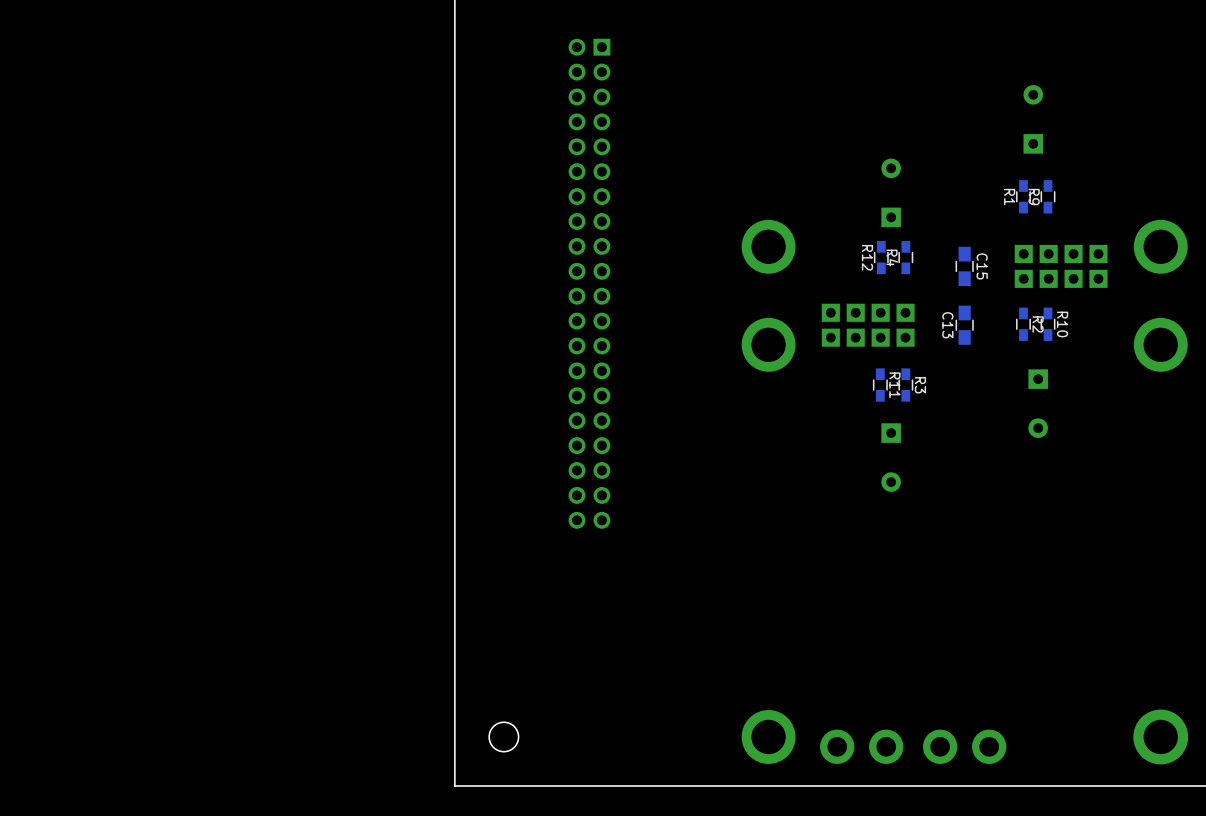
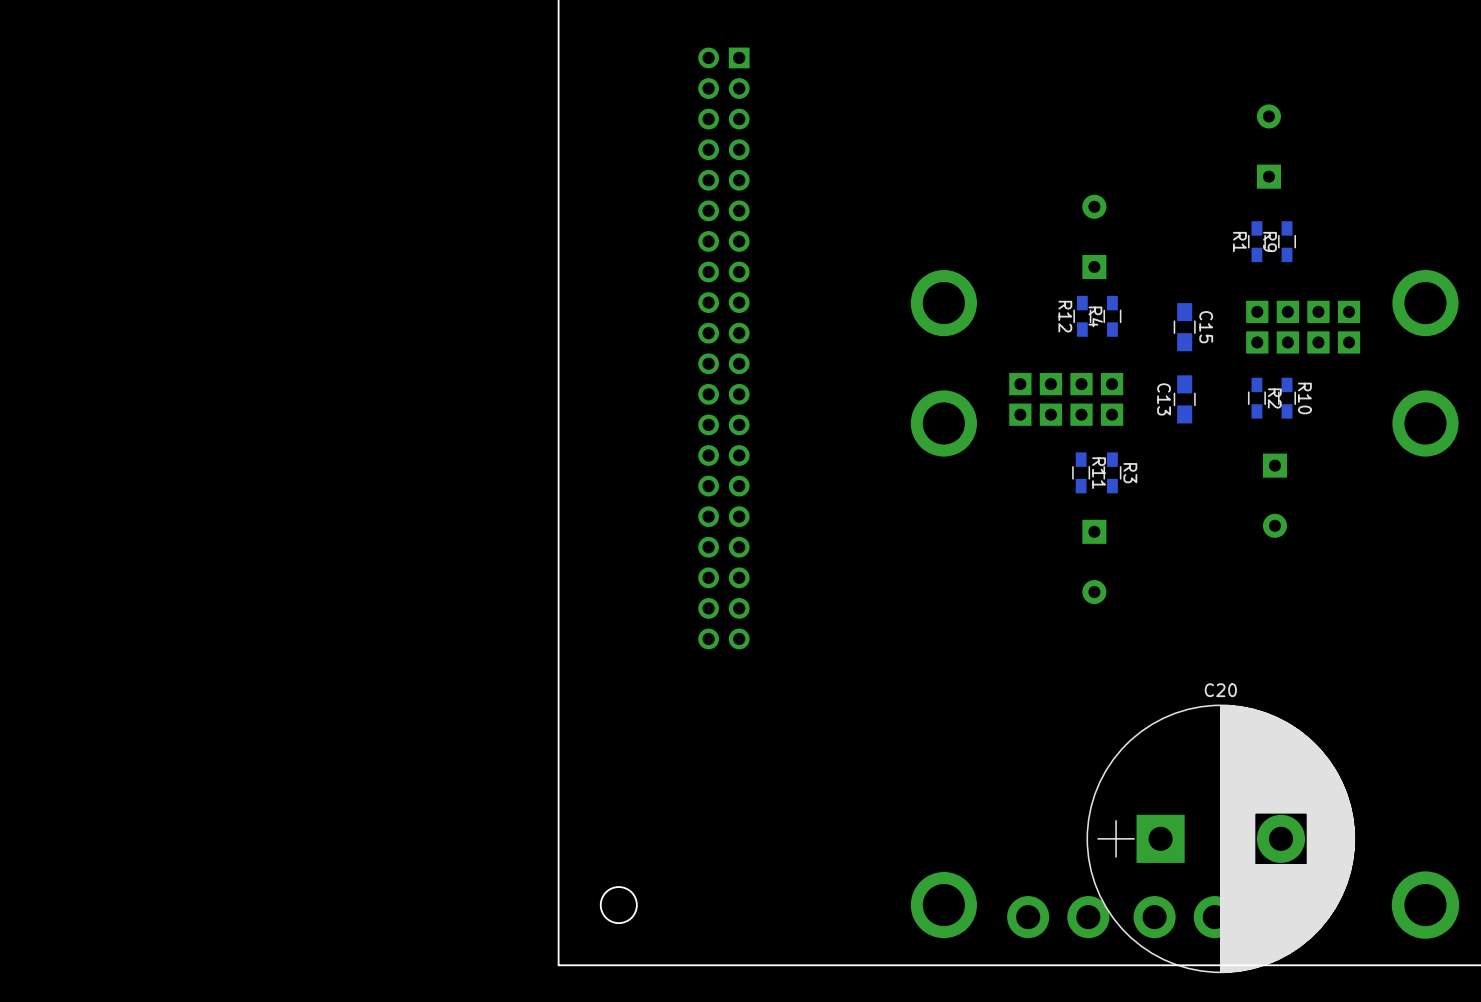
C20: none -> (1220, 838)

